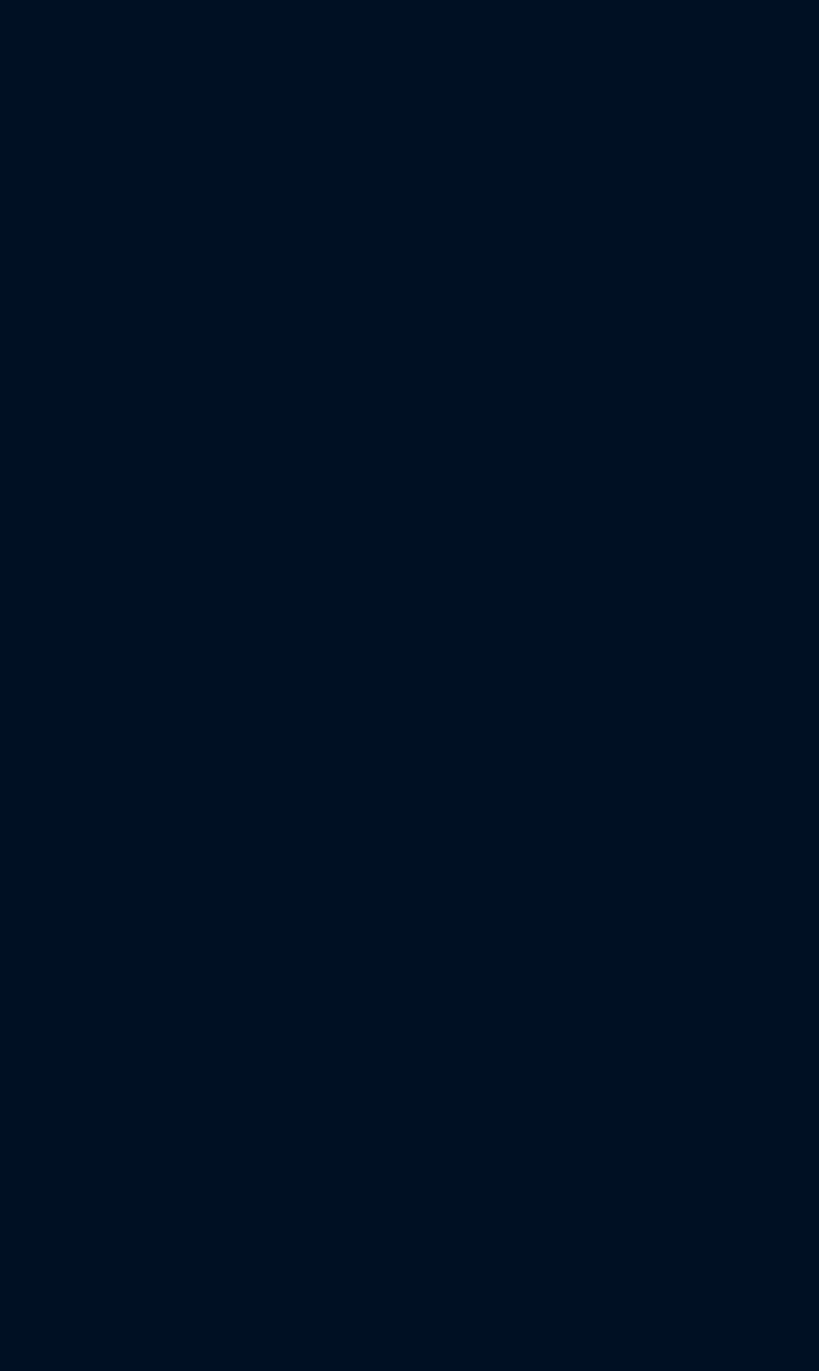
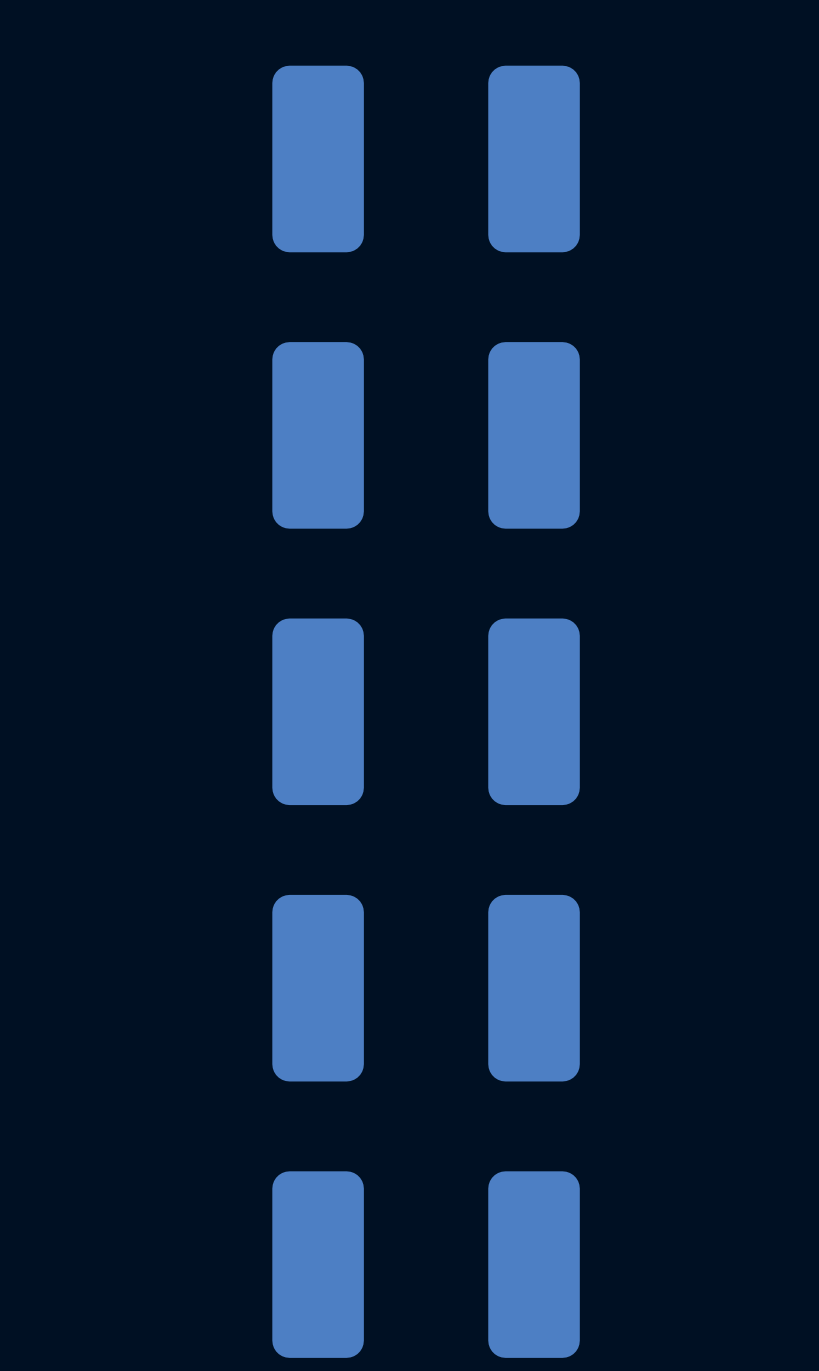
part: none -> (426, 158)
part: none -> (426, 435)
part: none -> (426, 711)
part: none -> (426, 988)
part: none -> (426, 1264)

